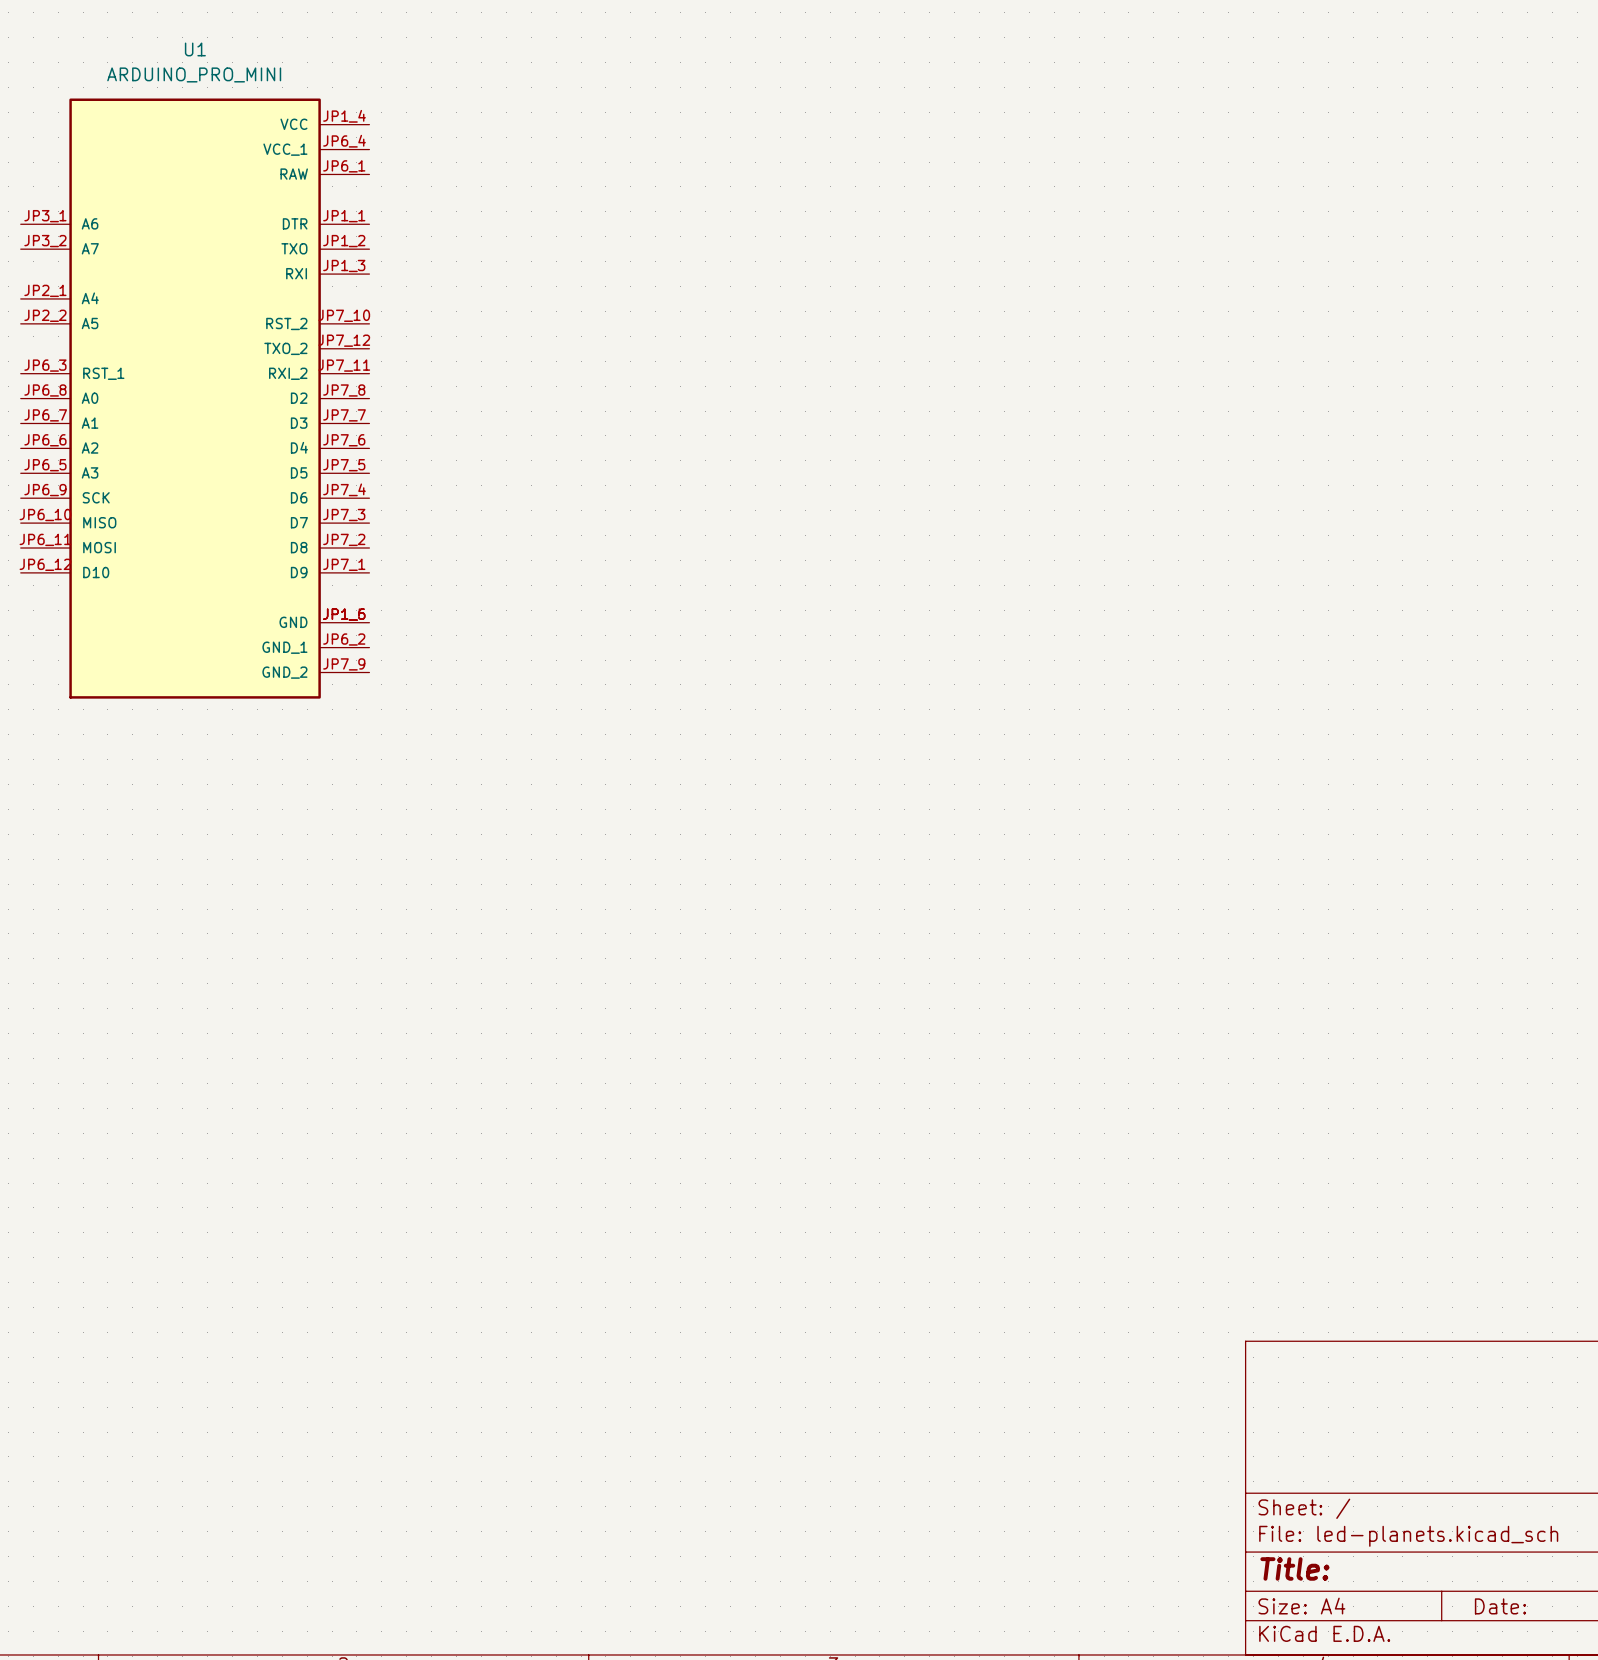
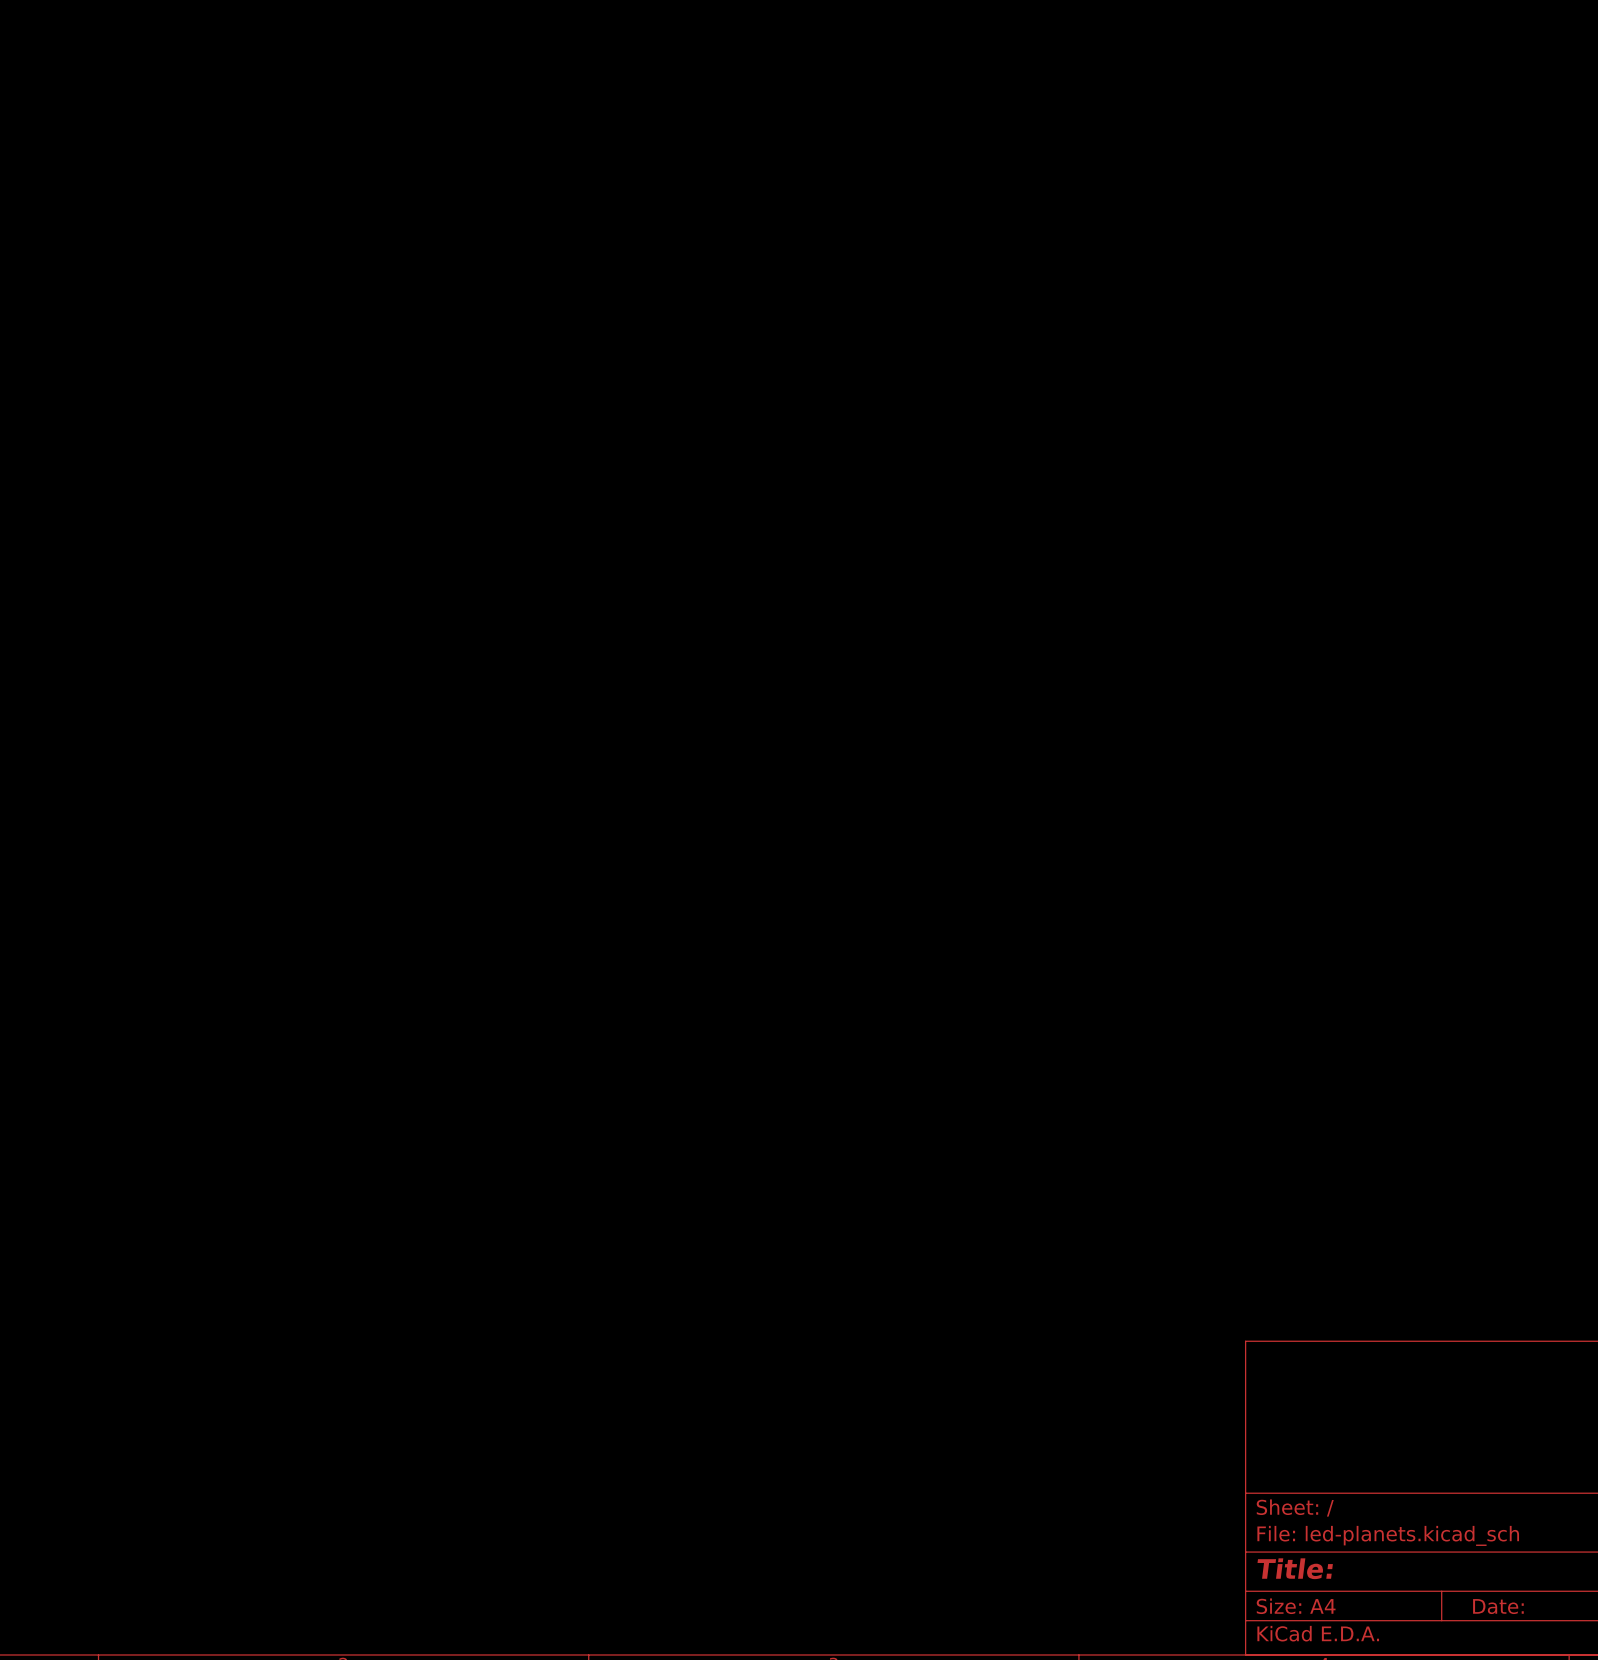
U1: ARDUINO_PRO_MINI (195, 398) -> none

